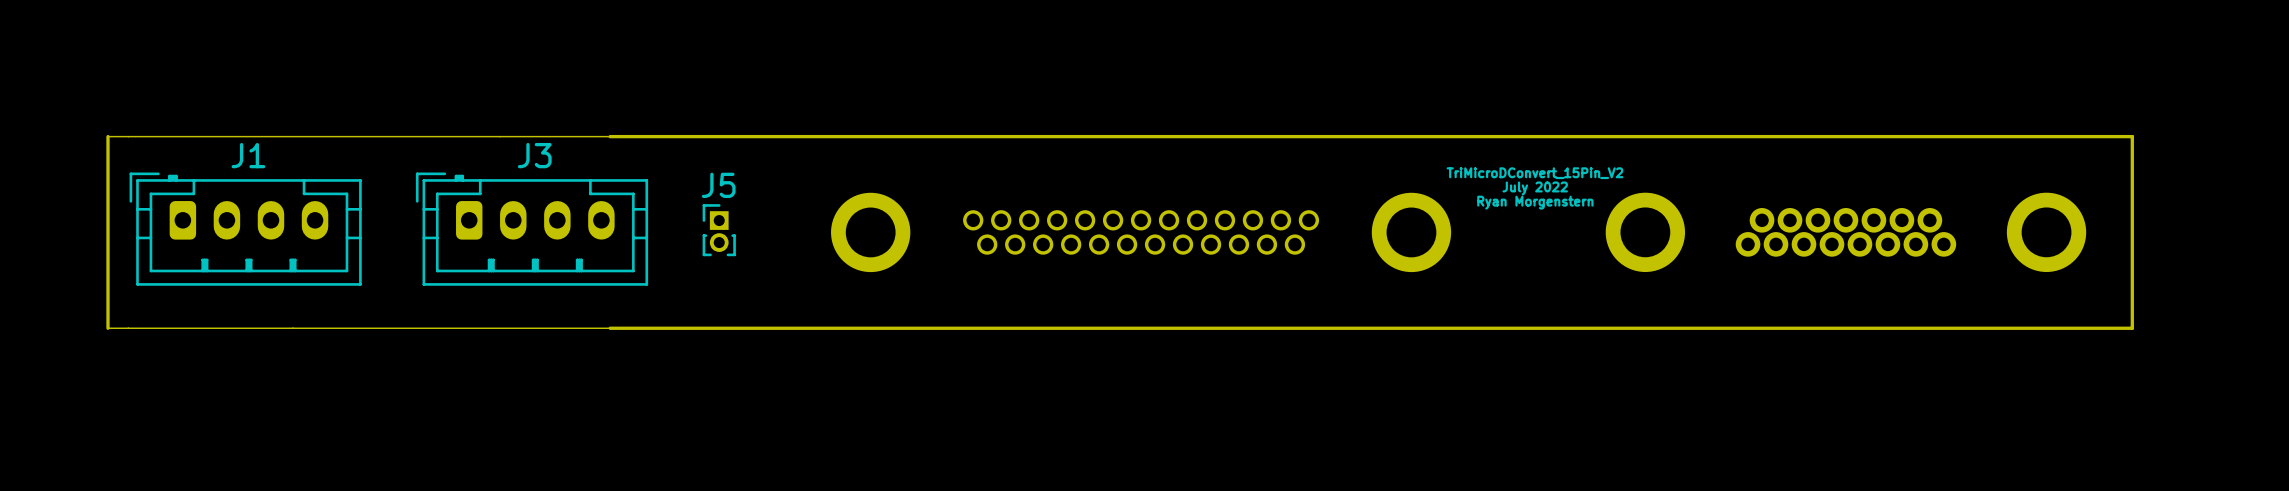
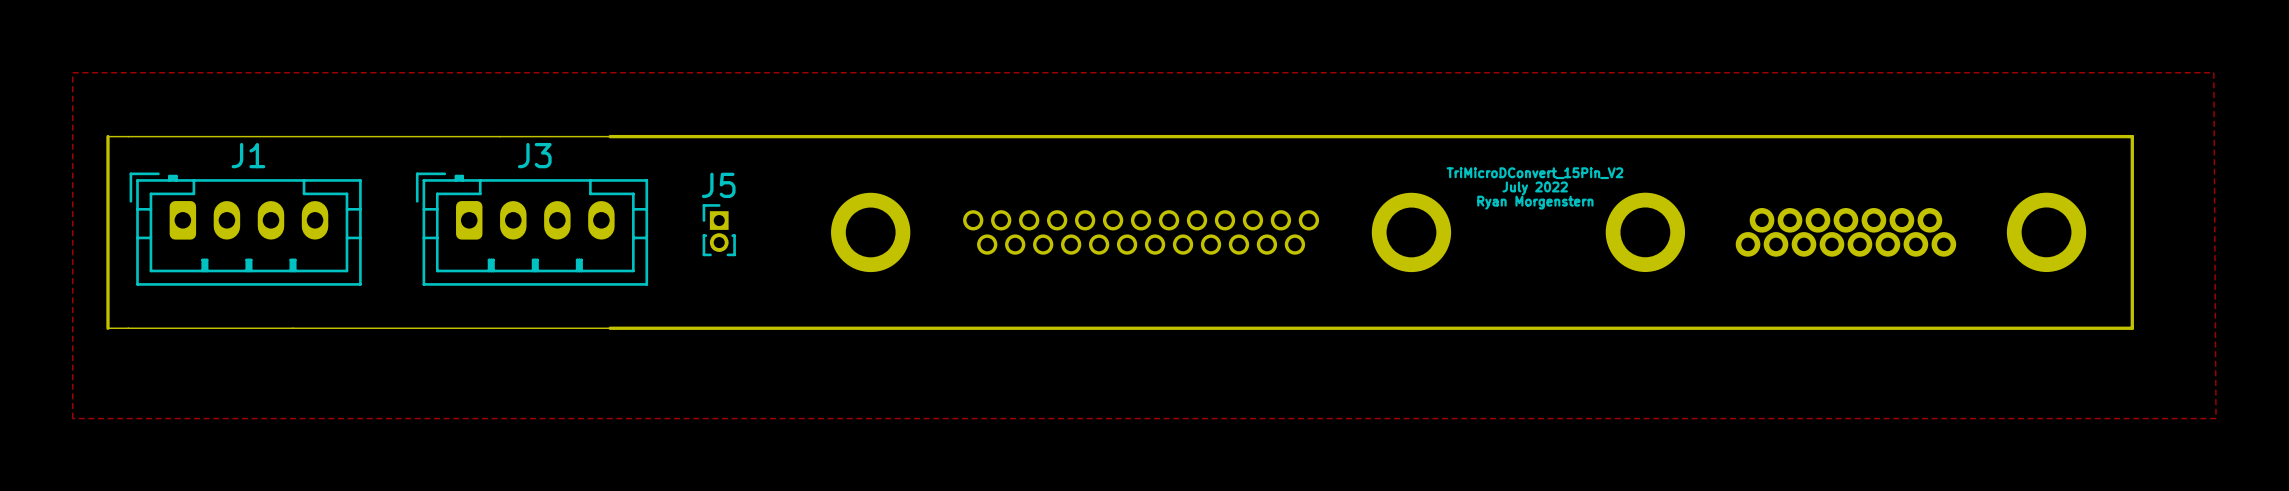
zone outline: none -> (72, 72) (72, 418) (2216, 418) (2213, 72) (72, 72)

